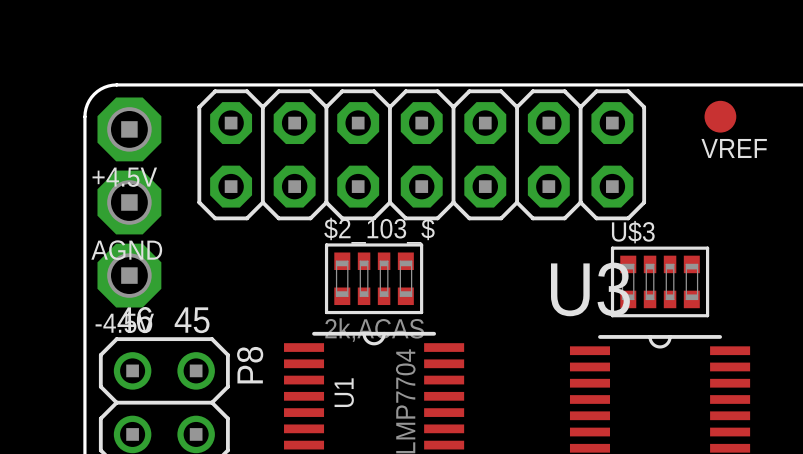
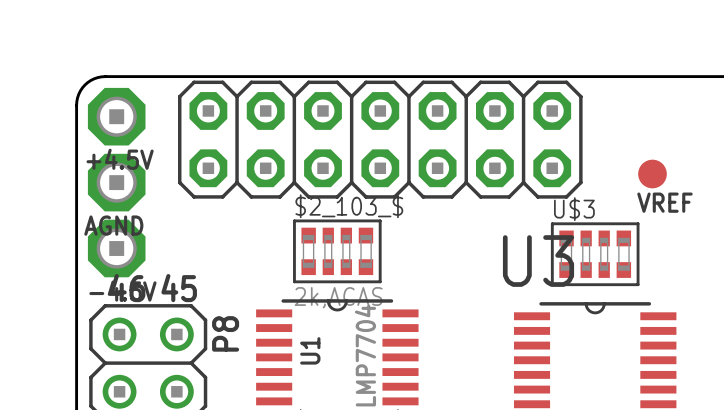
VREF position: (720, 116) -> (652, 174)

